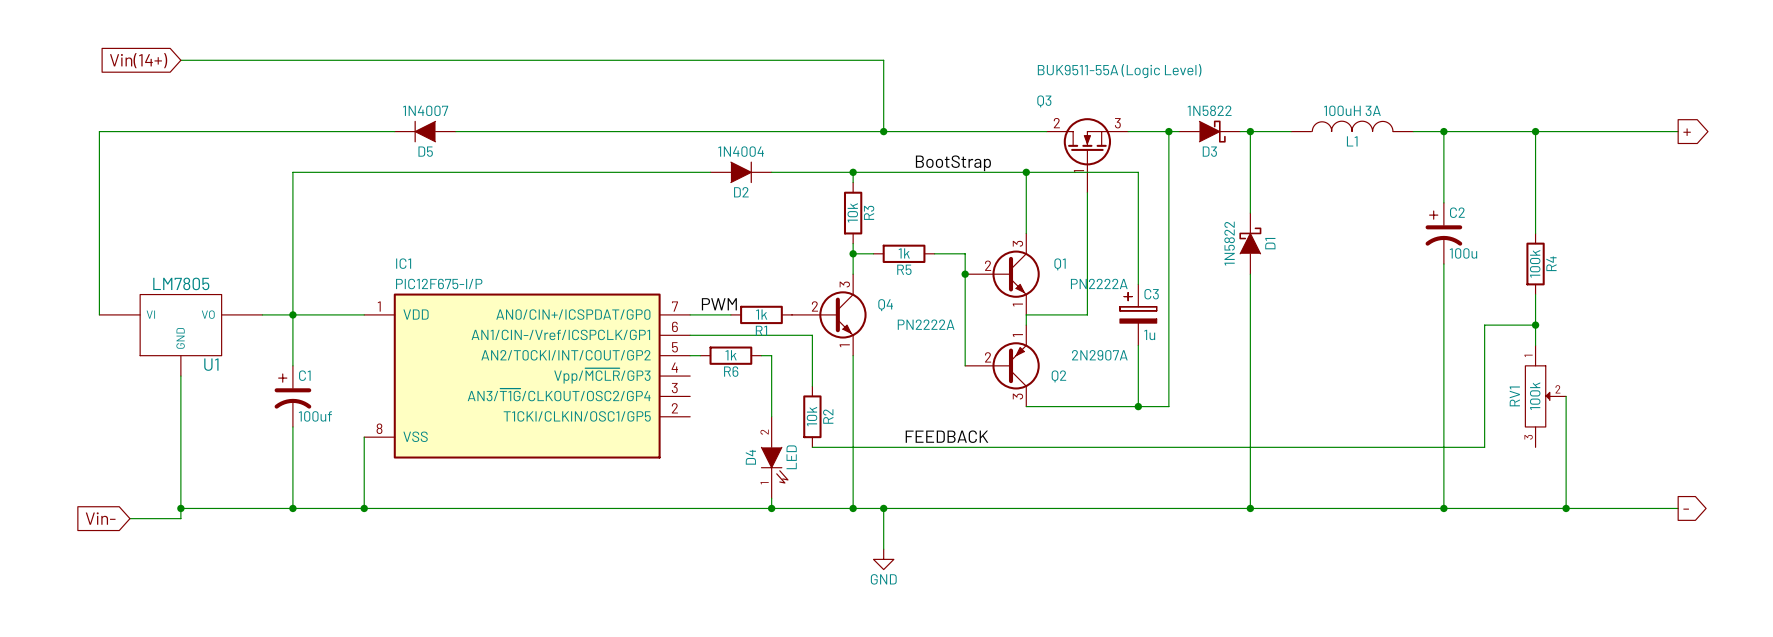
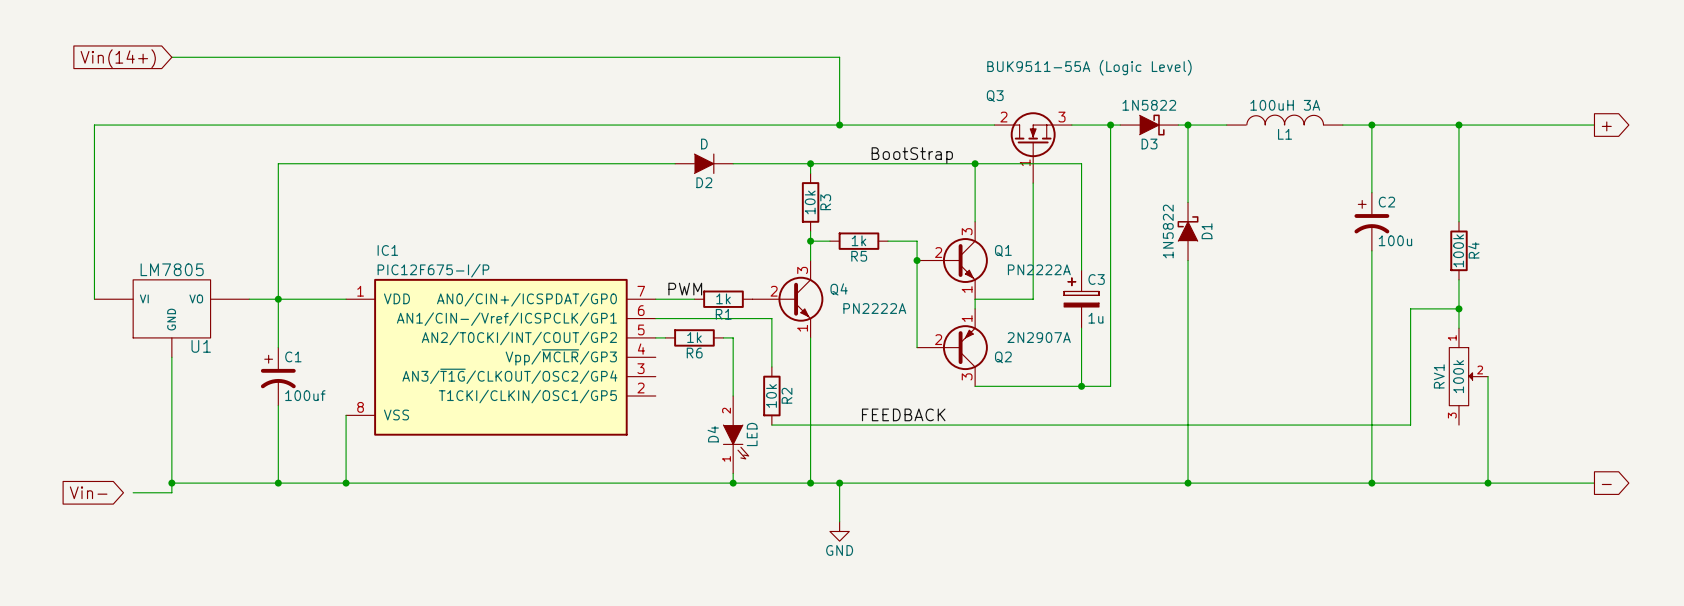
D5: 1N4007 (425, 131) -> none
D2 value: 1N4004 (741, 151) -> D (704, 144)
wire: (129, 518) (140, 518) -> none

